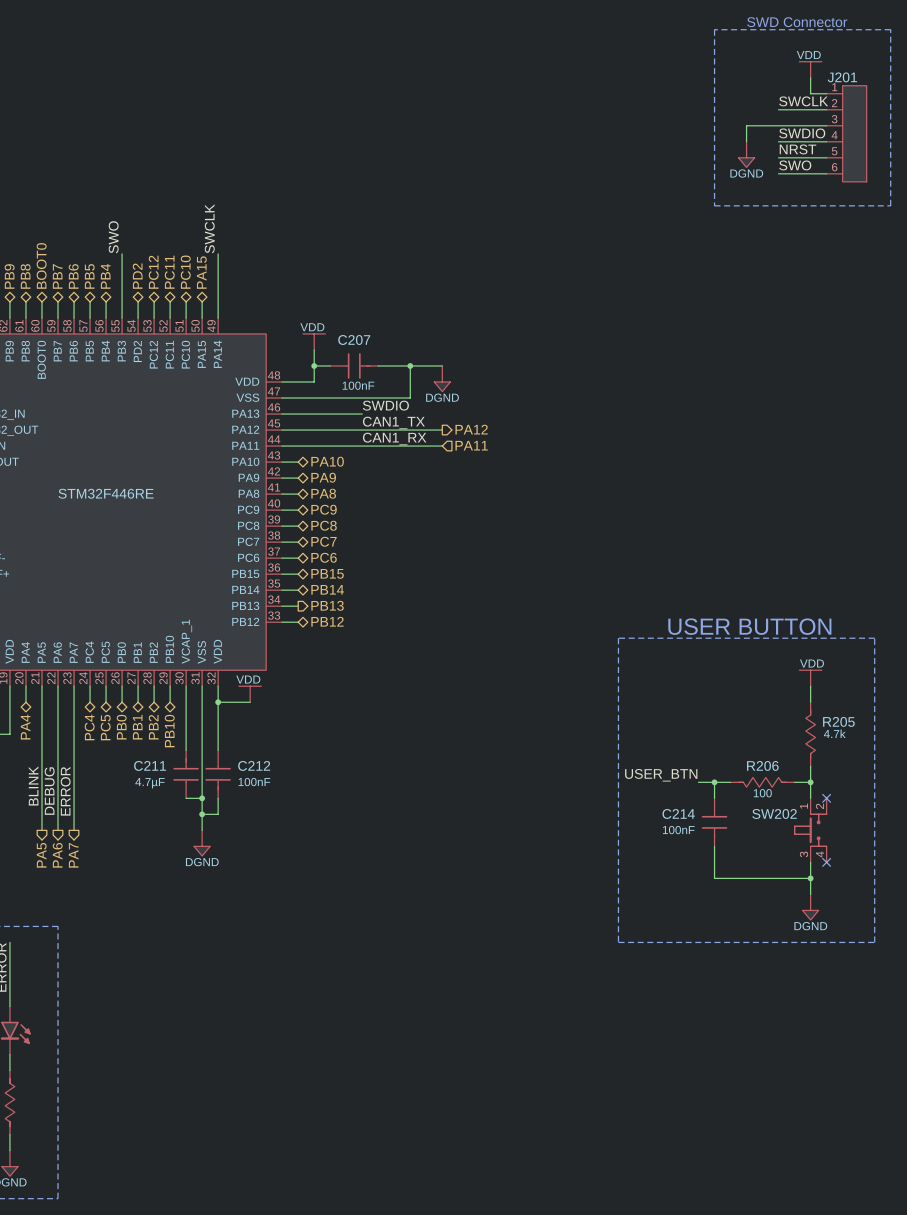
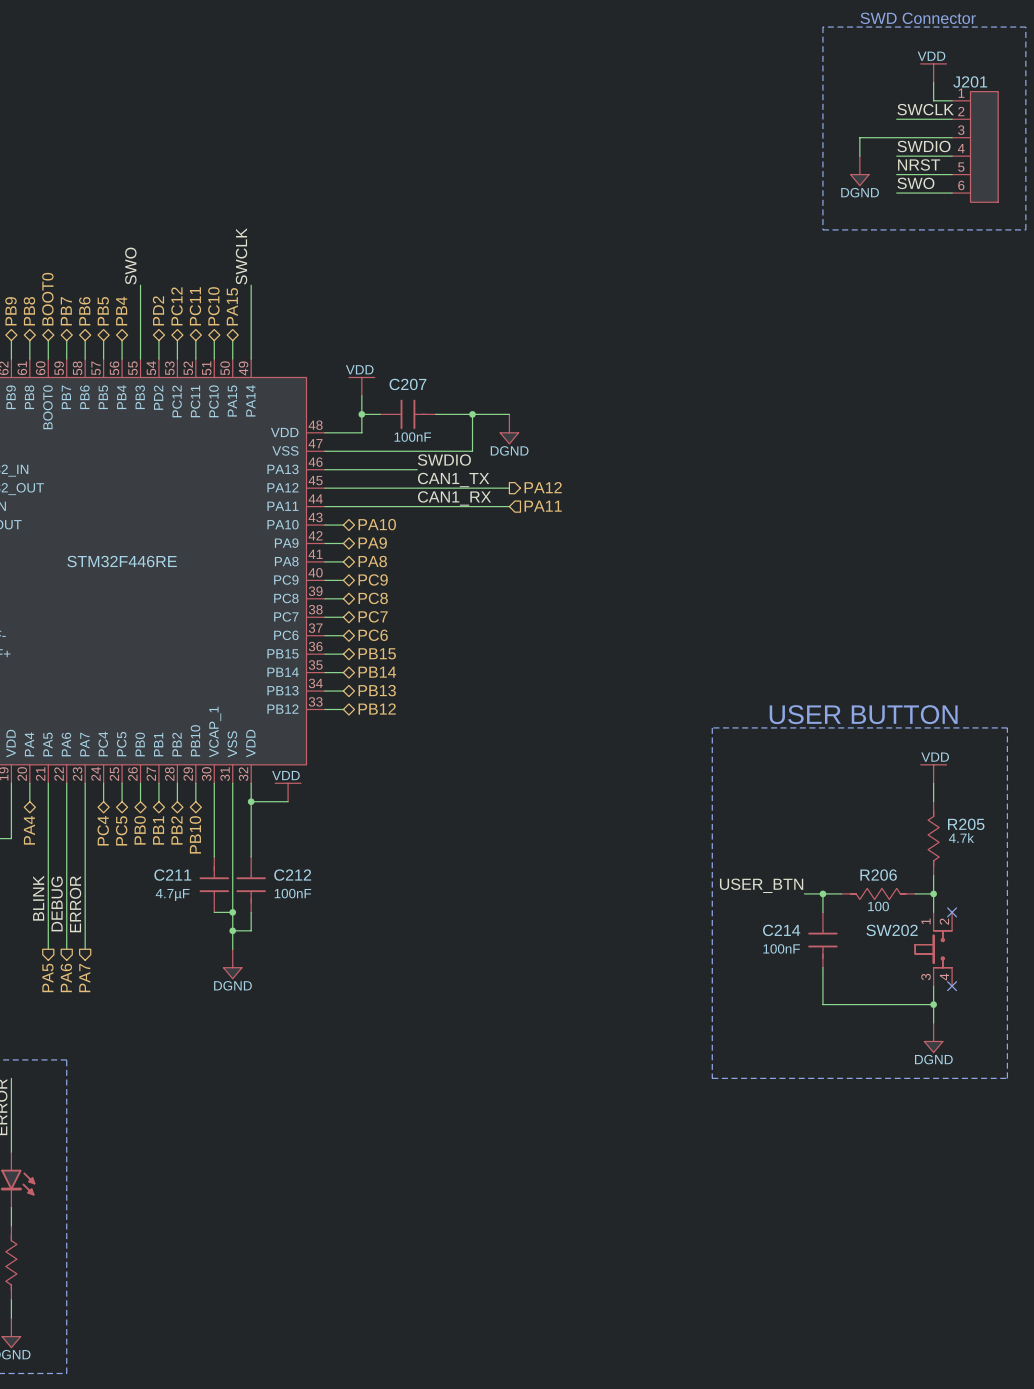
hierarchical label shape: output (327, 605) -> bidirectional (377, 690)

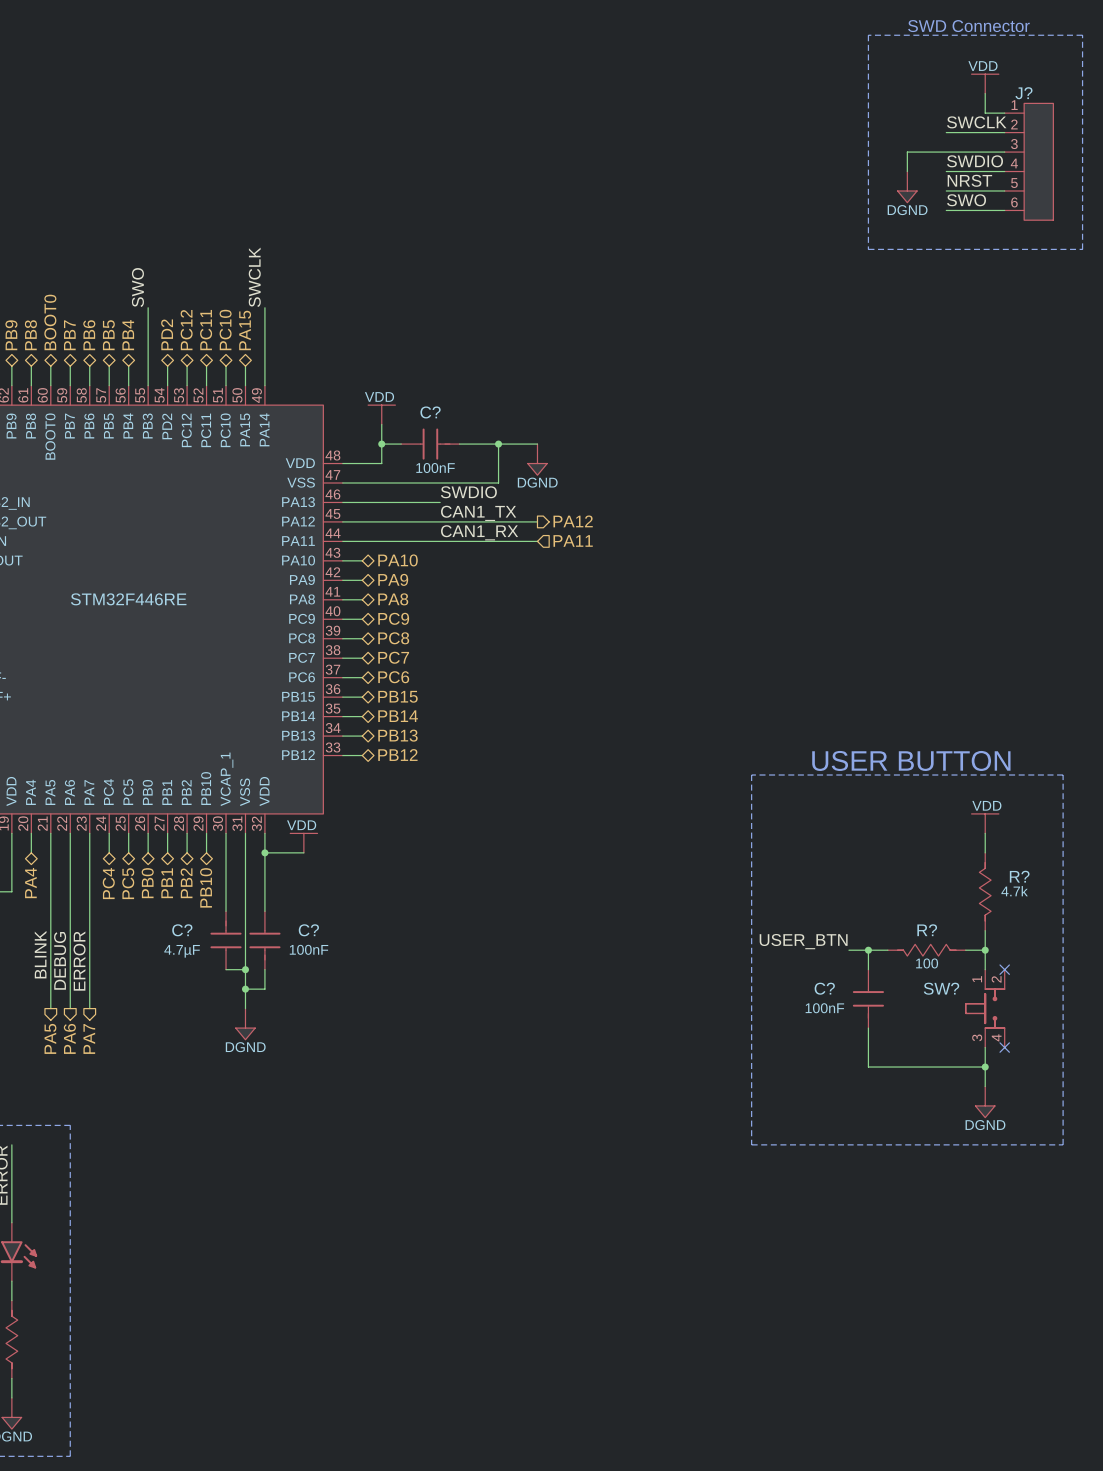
J201 name: J201 (970, 81) -> J? (1023, 93)
C207 name: C207 (407, 384) -> C? (430, 412)
R205 name: R205 (966, 824) -> R? (1019, 876)
C211 name: C211 (172, 875) -> C? (182, 930)
C212 name: C212 (292, 875) -> C? (308, 930)
R206 name: R206 (878, 875) -> R? (927, 930)
C214 name: C214 (781, 930) -> C? (824, 988)
SW202 name: SW202 (892, 930) -> SW? (941, 988)

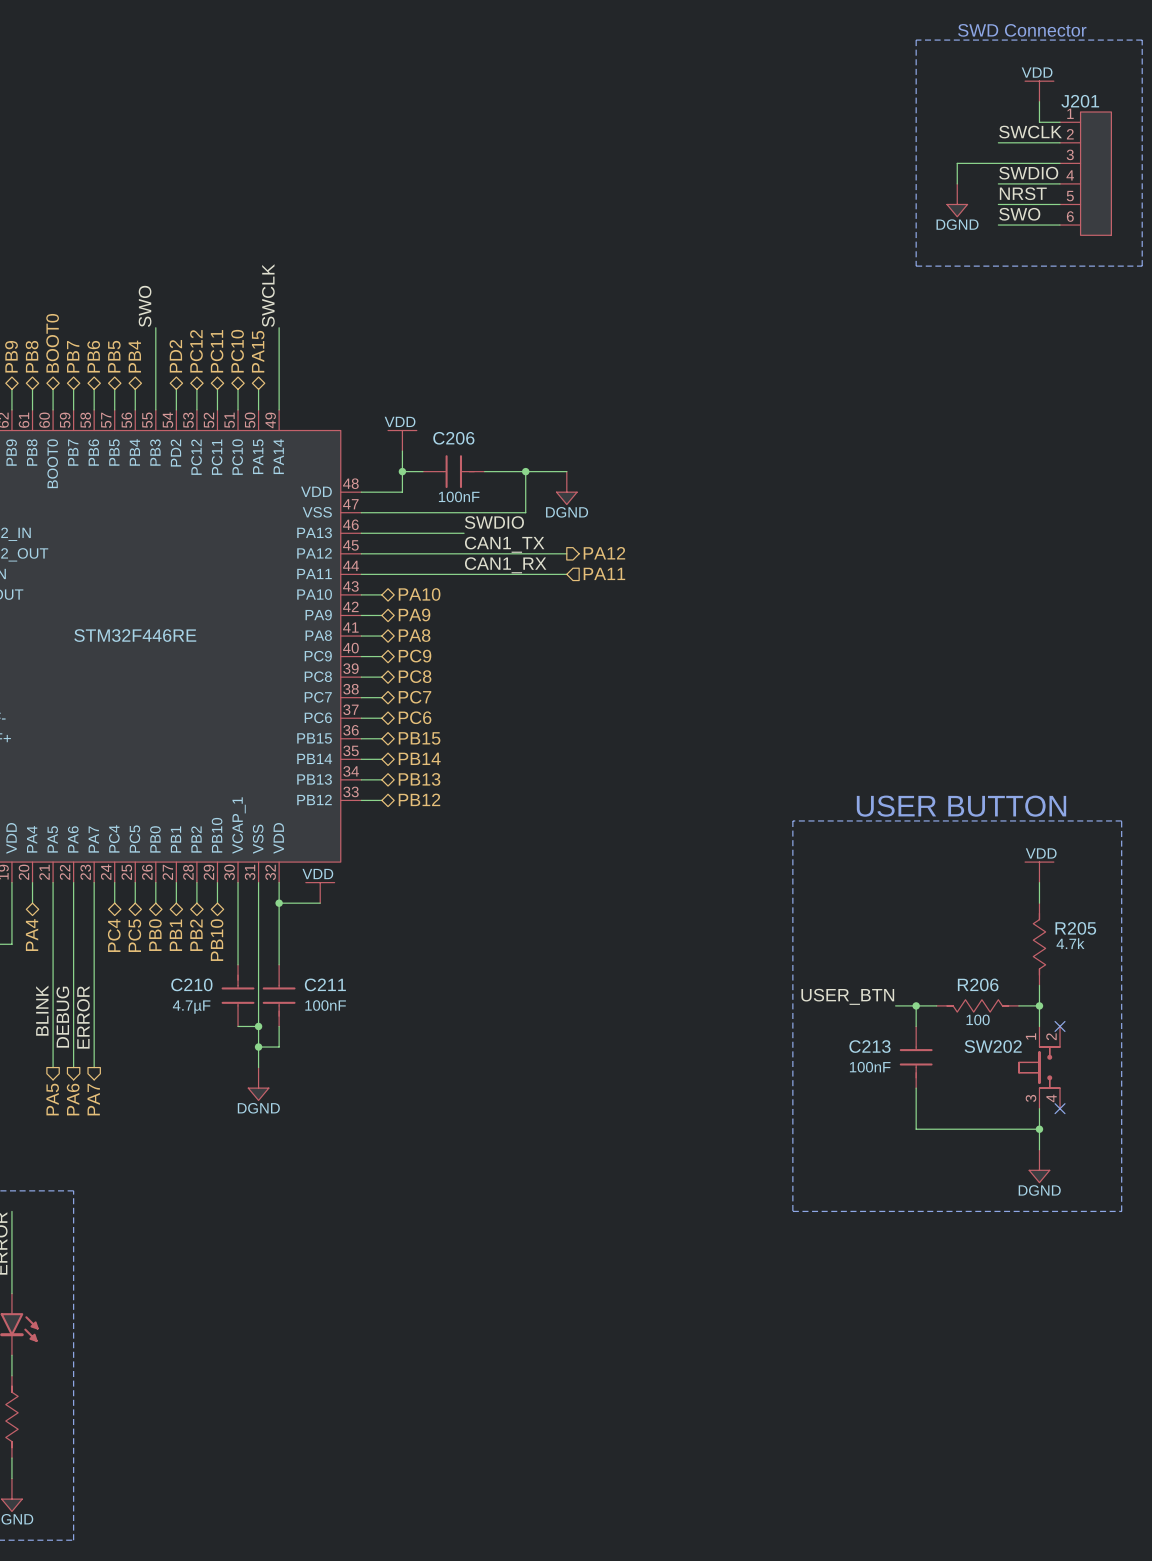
J? name: J? (1023, 93) -> J201 (1080, 101)
C? name: C? (430, 412) -> C206 (453, 438)
R? name: R? (1019, 876) -> R205 (1075, 928)
C? name: C? (182, 930) -> C210 (191, 984)
C? name: C? (308, 930) -> C211 (325, 984)
R? name: R? (927, 930) -> R206 (978, 984)
C? name: C? (824, 988) -> C213 (869, 1046)
SW? name: SW? (941, 988) -> SW202 (993, 1046)

